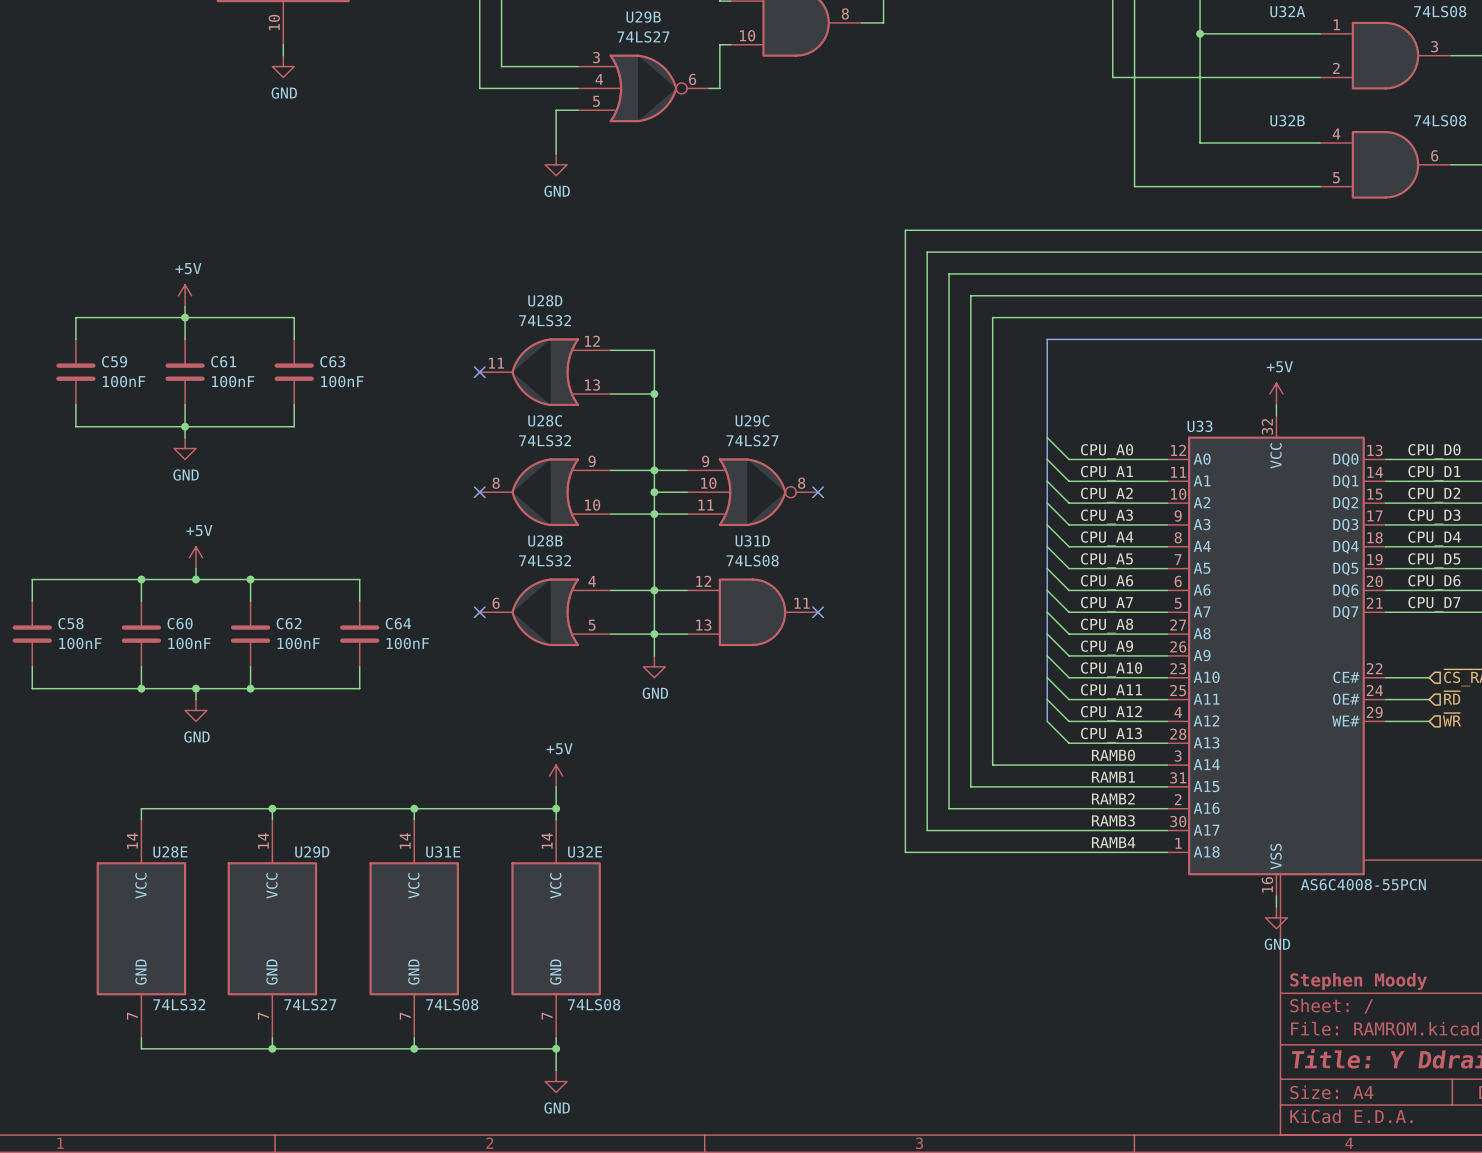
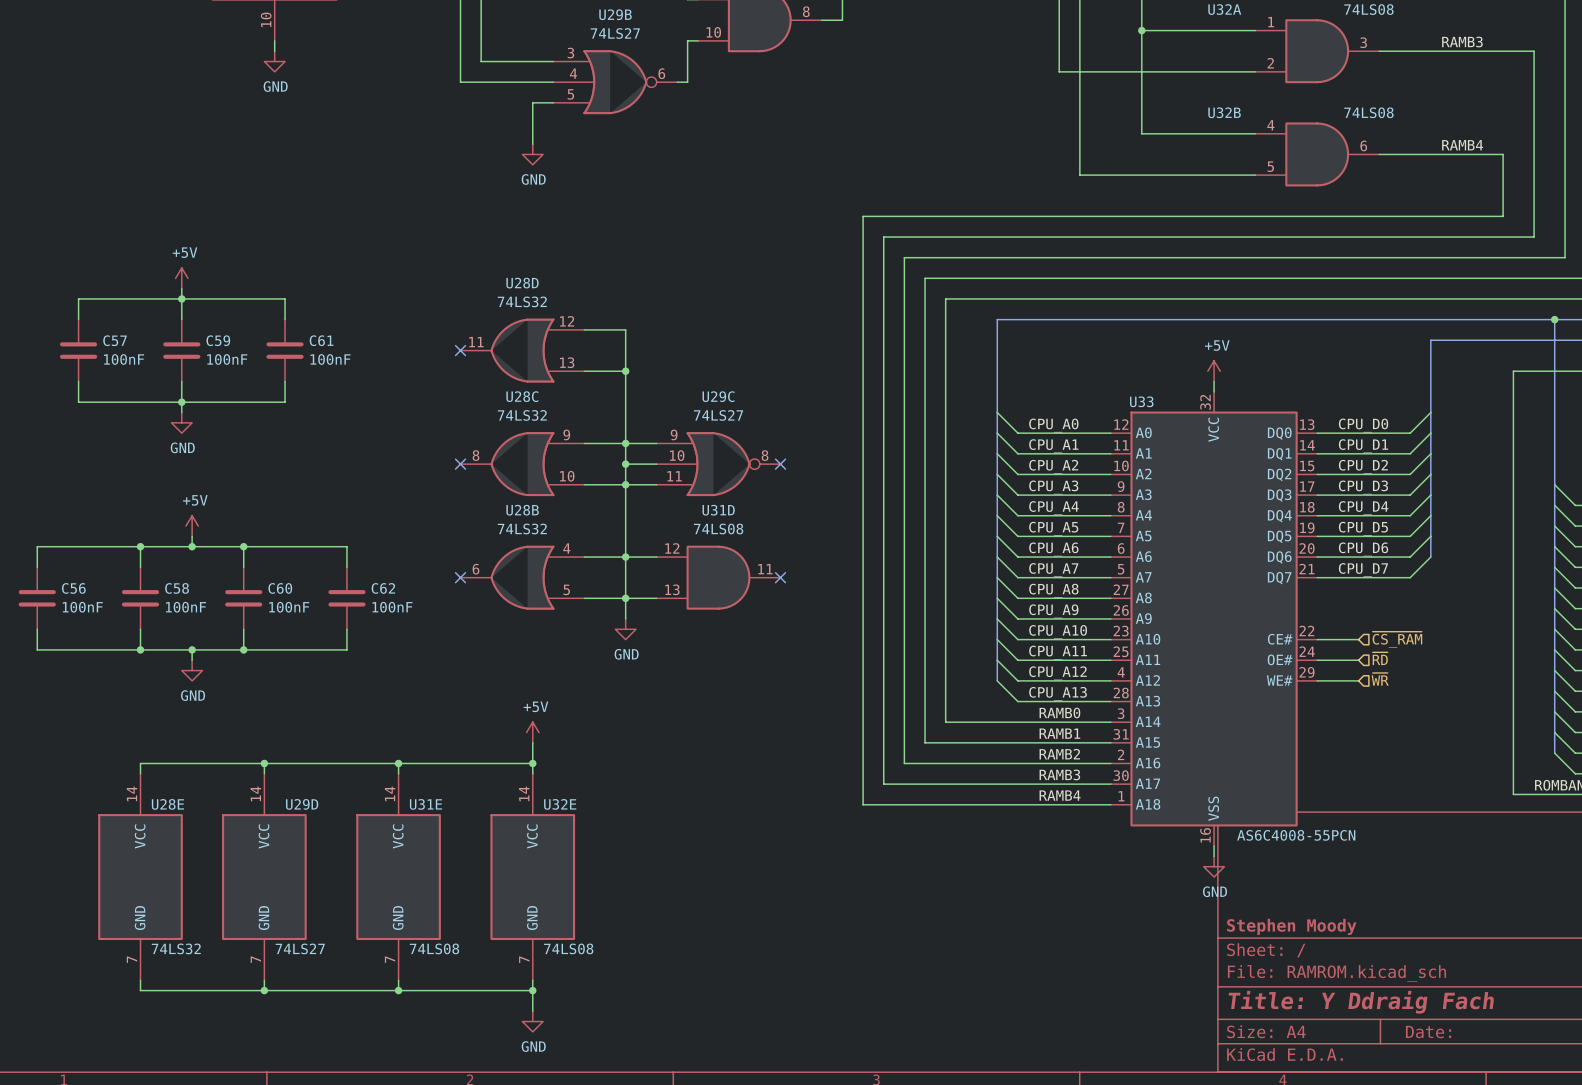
C59 name: C59 (114, 361) -> C57 (115, 340)
C61 name: C61 (223, 361) -> C59 (218, 340)
C63 name: C63 (332, 361) -> C61 (321, 340)
C58 name: C58 (70, 623) -> C56 (73, 588)
C60 name: C60 (180, 623) -> C58 (177, 588)
C62 name: C62 (289, 623) -> C60 (280, 588)
C64 name: C64 (398, 623) -> C62 (383, 588)

